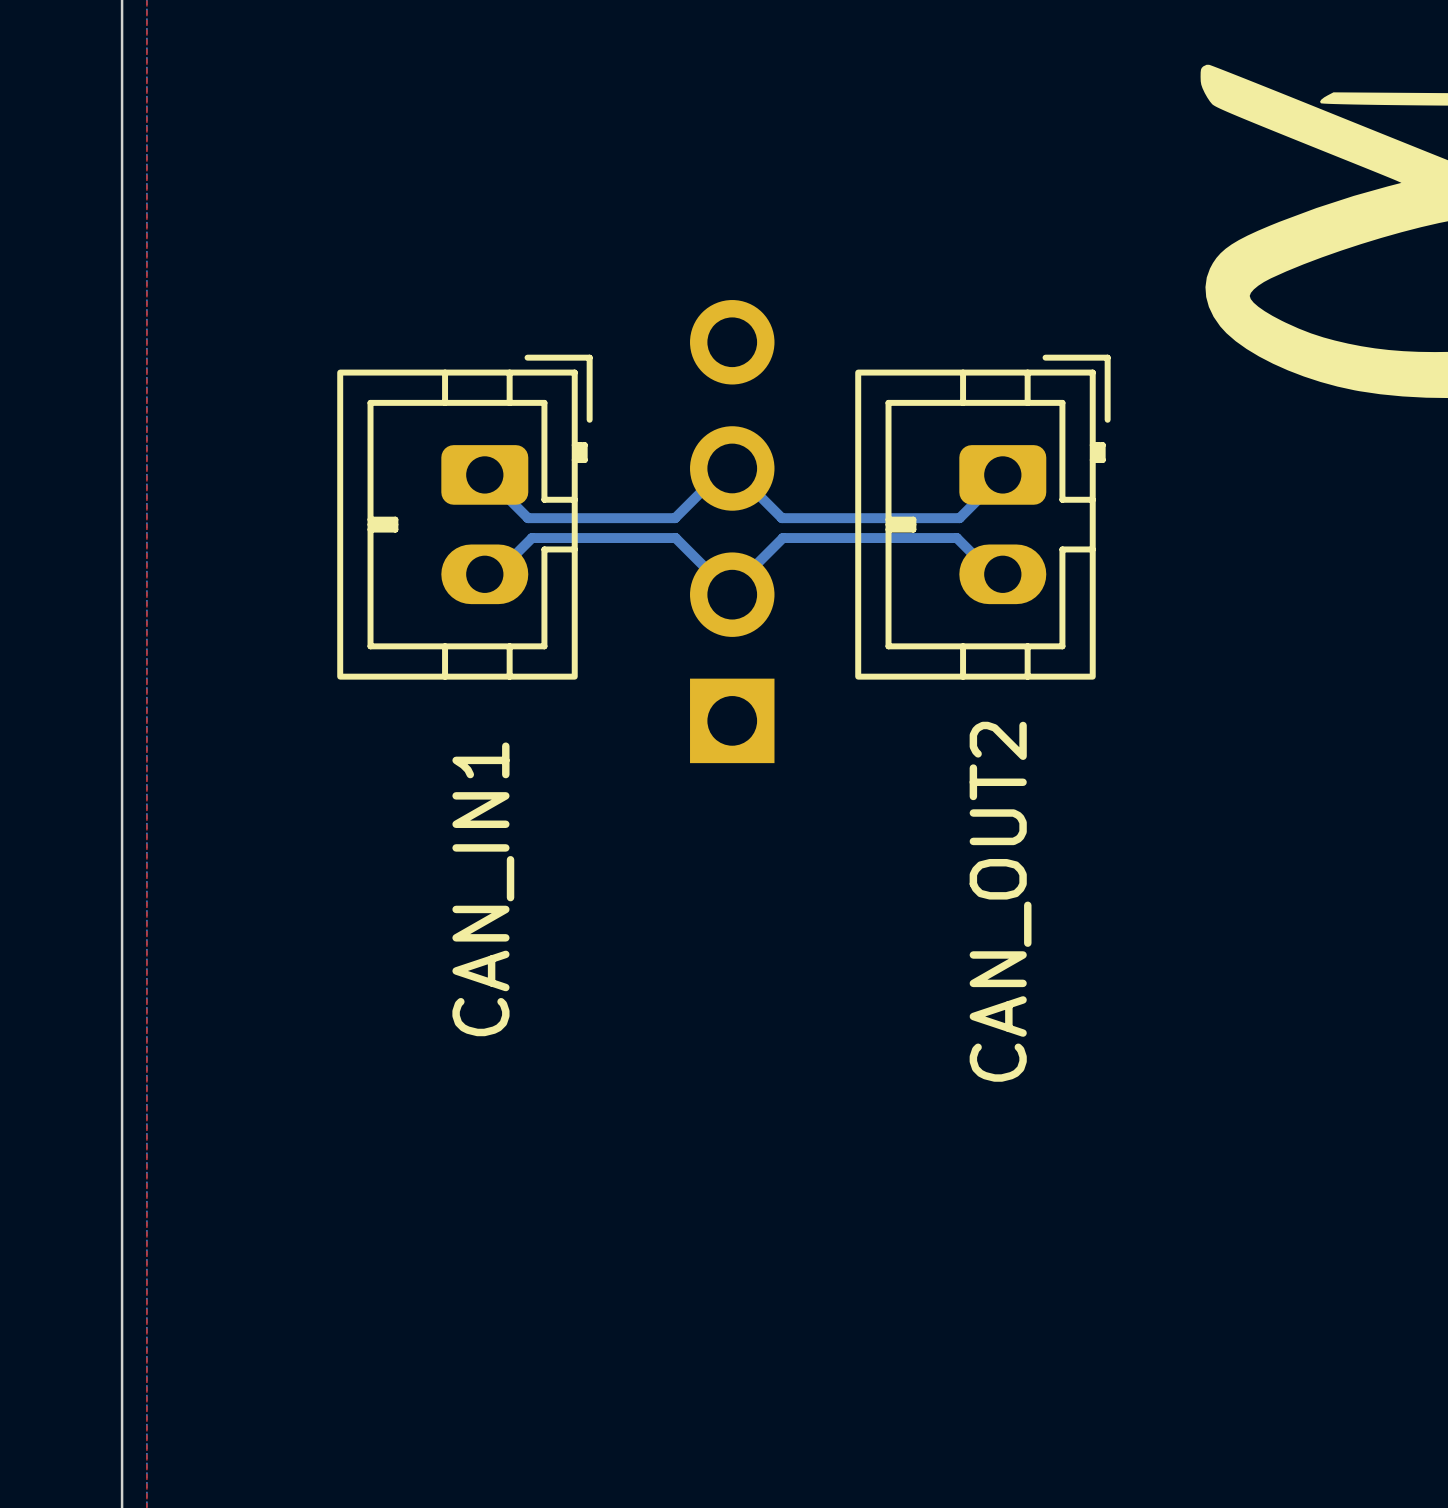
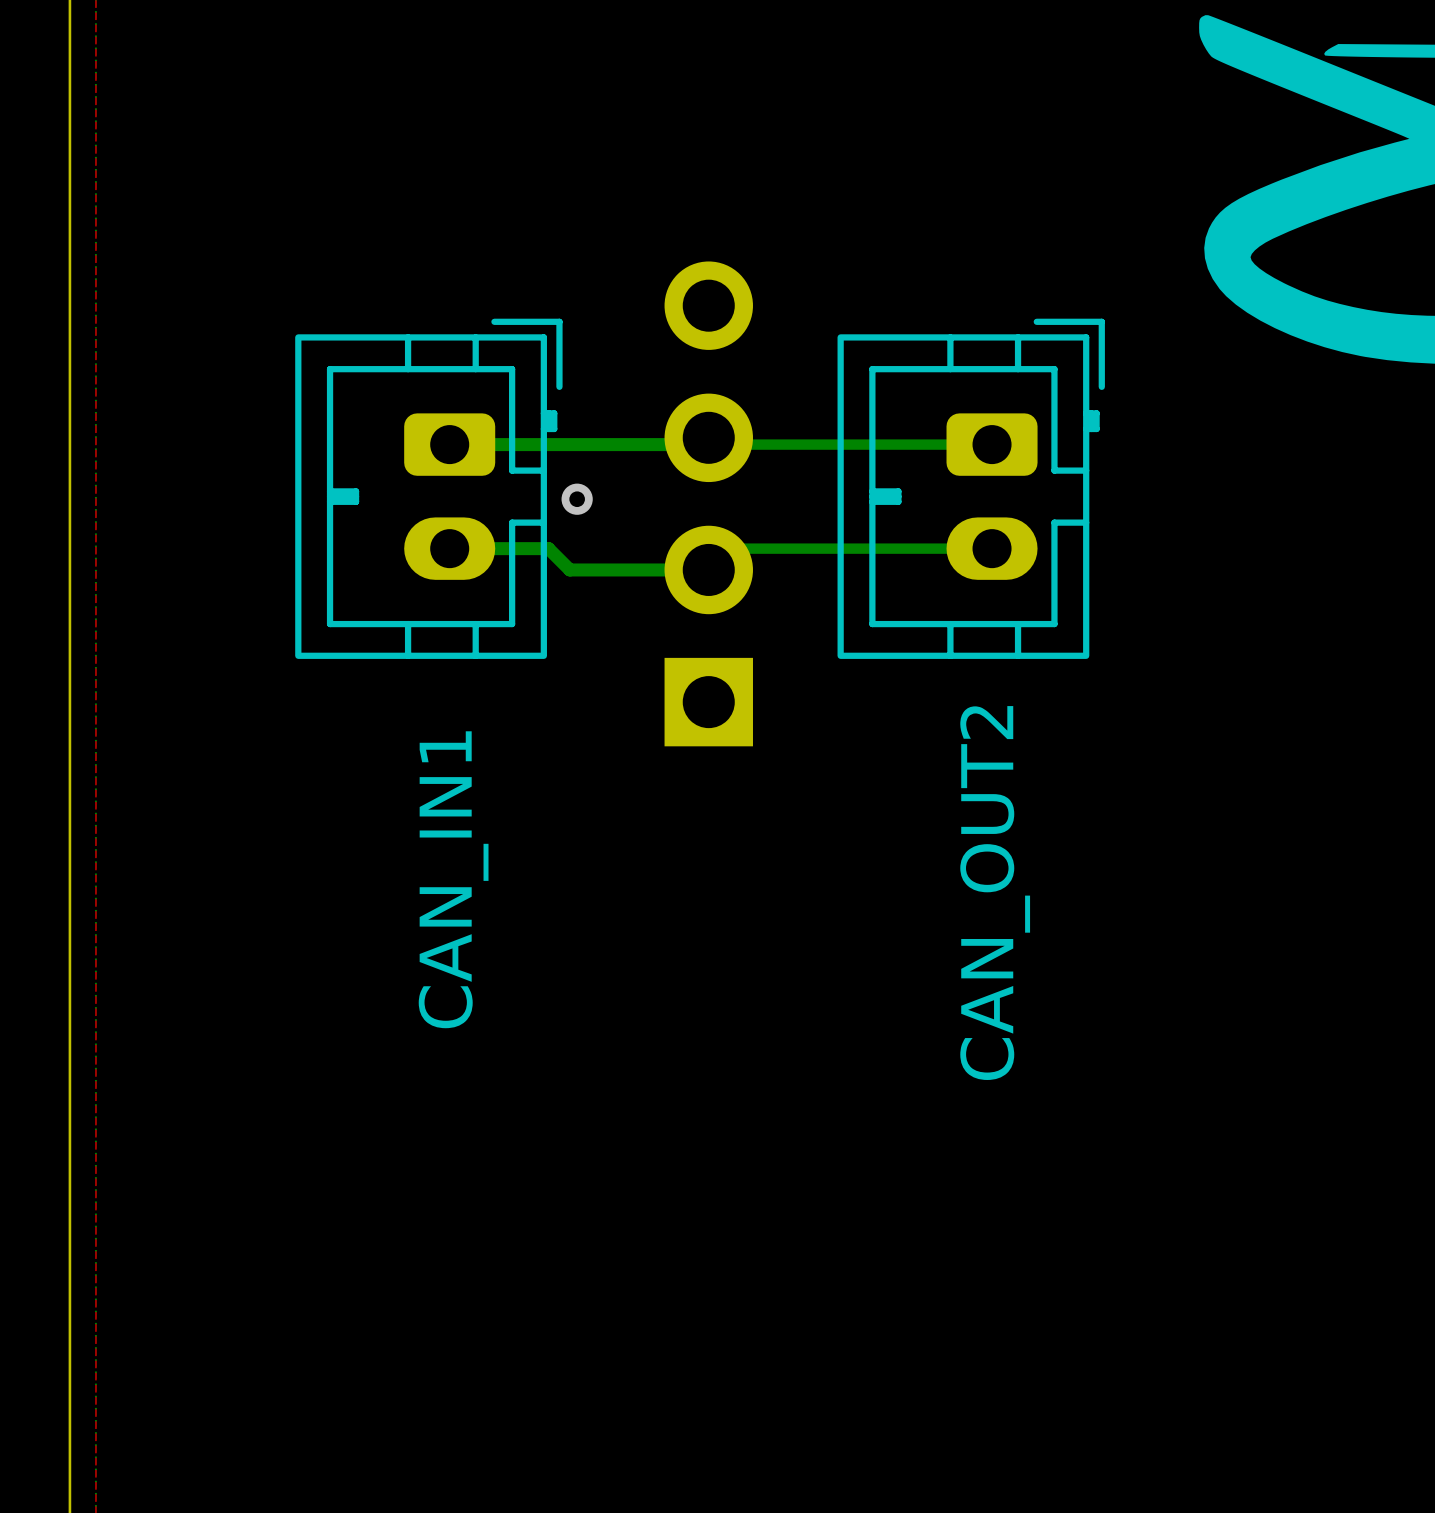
bottom track: (732, 468) (724, 468) (675, 518) (528, 518) (484, 474) -> (708, 437) (702, 444) (449, 444)
bottom track: (738, 474) (781, 518) (959, 518) (1002, 474) -> (715, 444) (992, 444)
via: none -> (577, 499)
bottom track: (495, 574) (532, 538) (675, 538) (732, 594) (732, 588) (782, 538) (956, 538) (993, 574) -> (461, 548) (548, 548) (569, 569) (708, 569) (730, 548) (981, 548)

